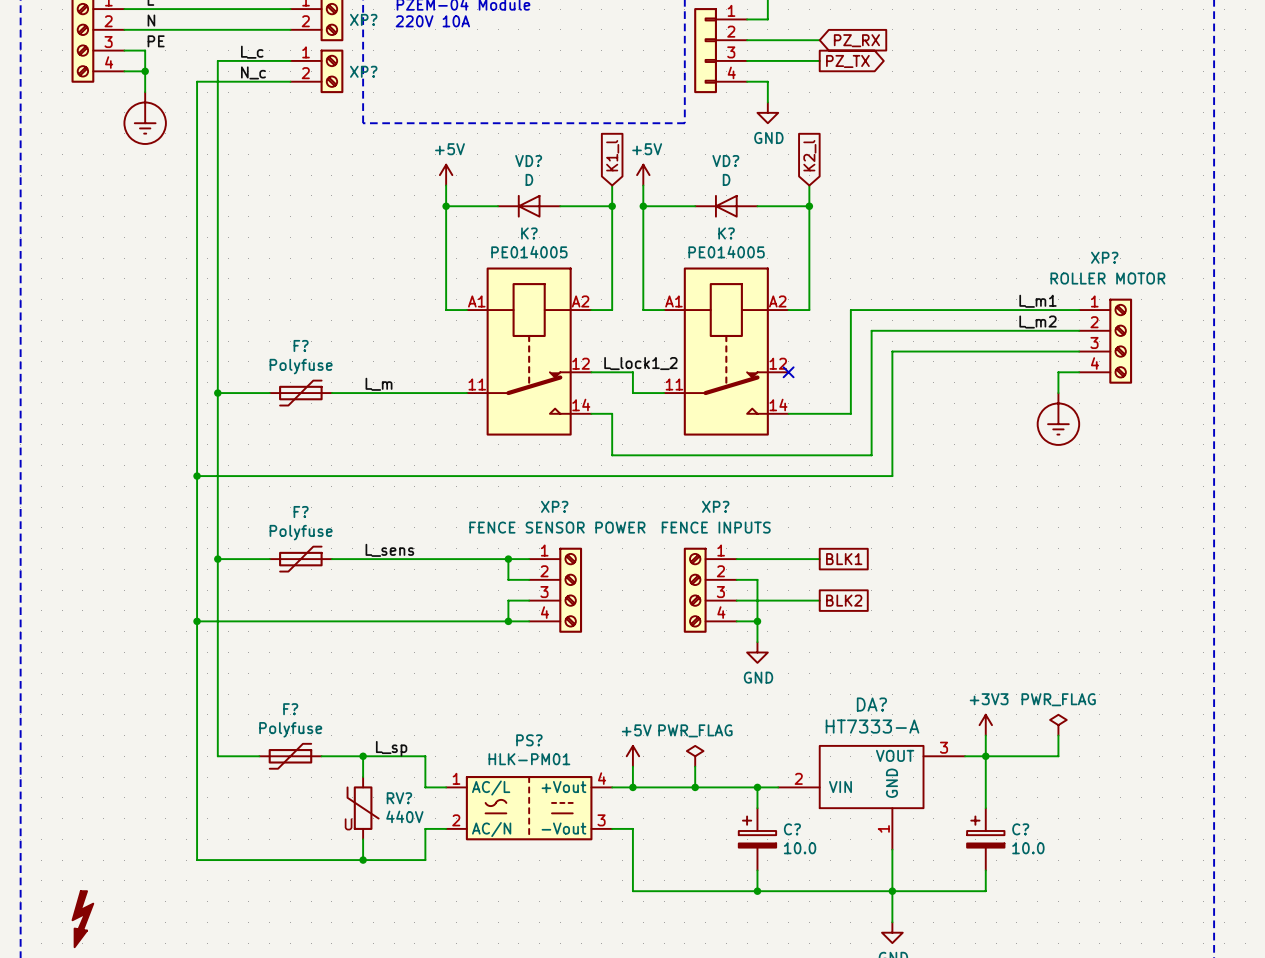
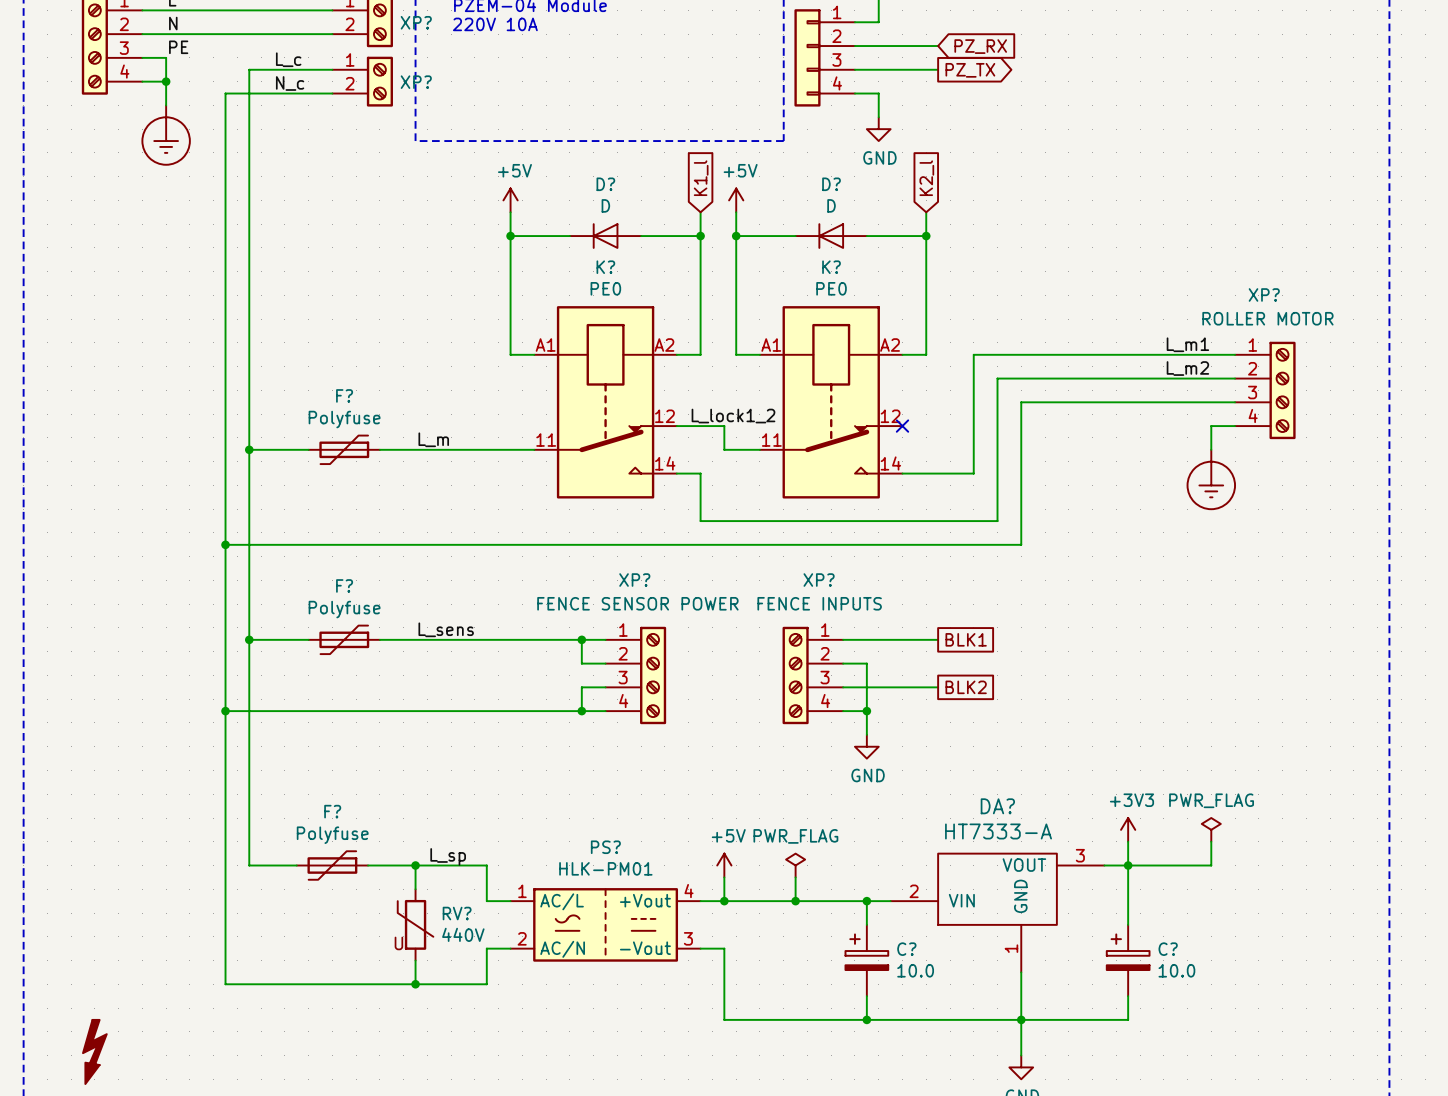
VD? name: VD? (528, 161) -> D? (605, 184)
VD? name: VD? (725, 161) -> D? (831, 184)
K? value: PE014005 (529, 252) -> PE0 (605, 288)
K? value: PE014005 (726, 252) -> PE0 (831, 288)

